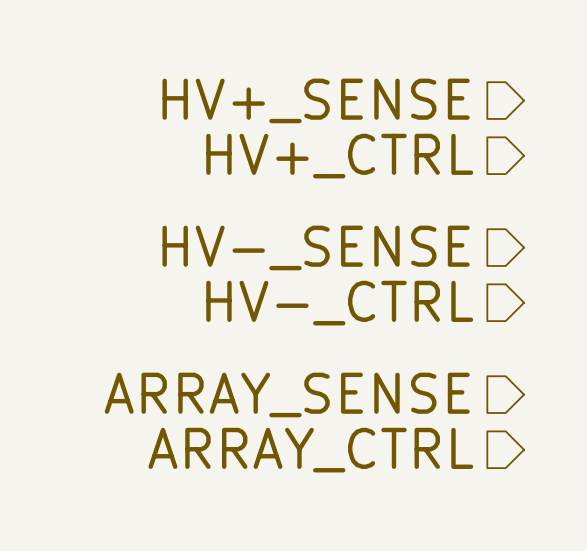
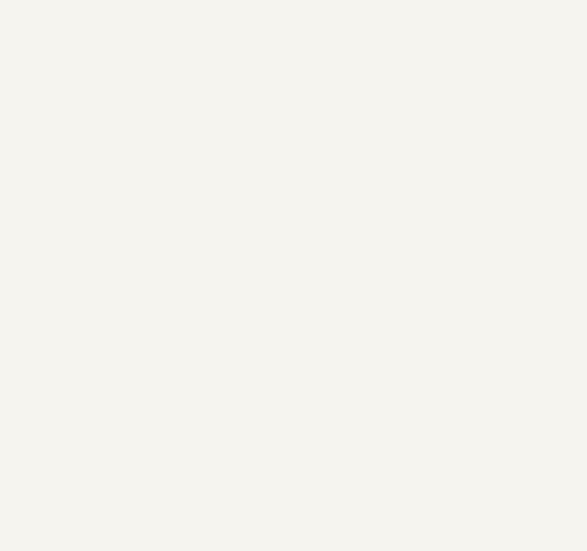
hierarchical label: HV+_SENSE (316, 100) -> none
hierarchical label: HV+_CTRL (339, 156) -> none
hierarchical label: HV-_SENSE (316, 247) -> none
hierarchical label: HV-_CTRL (339, 303) -> none
hierarchical label: ARRAY_SENSE (287, 394) -> none
hierarchical label: ARRAY_CTRL (310, 450) -> none

